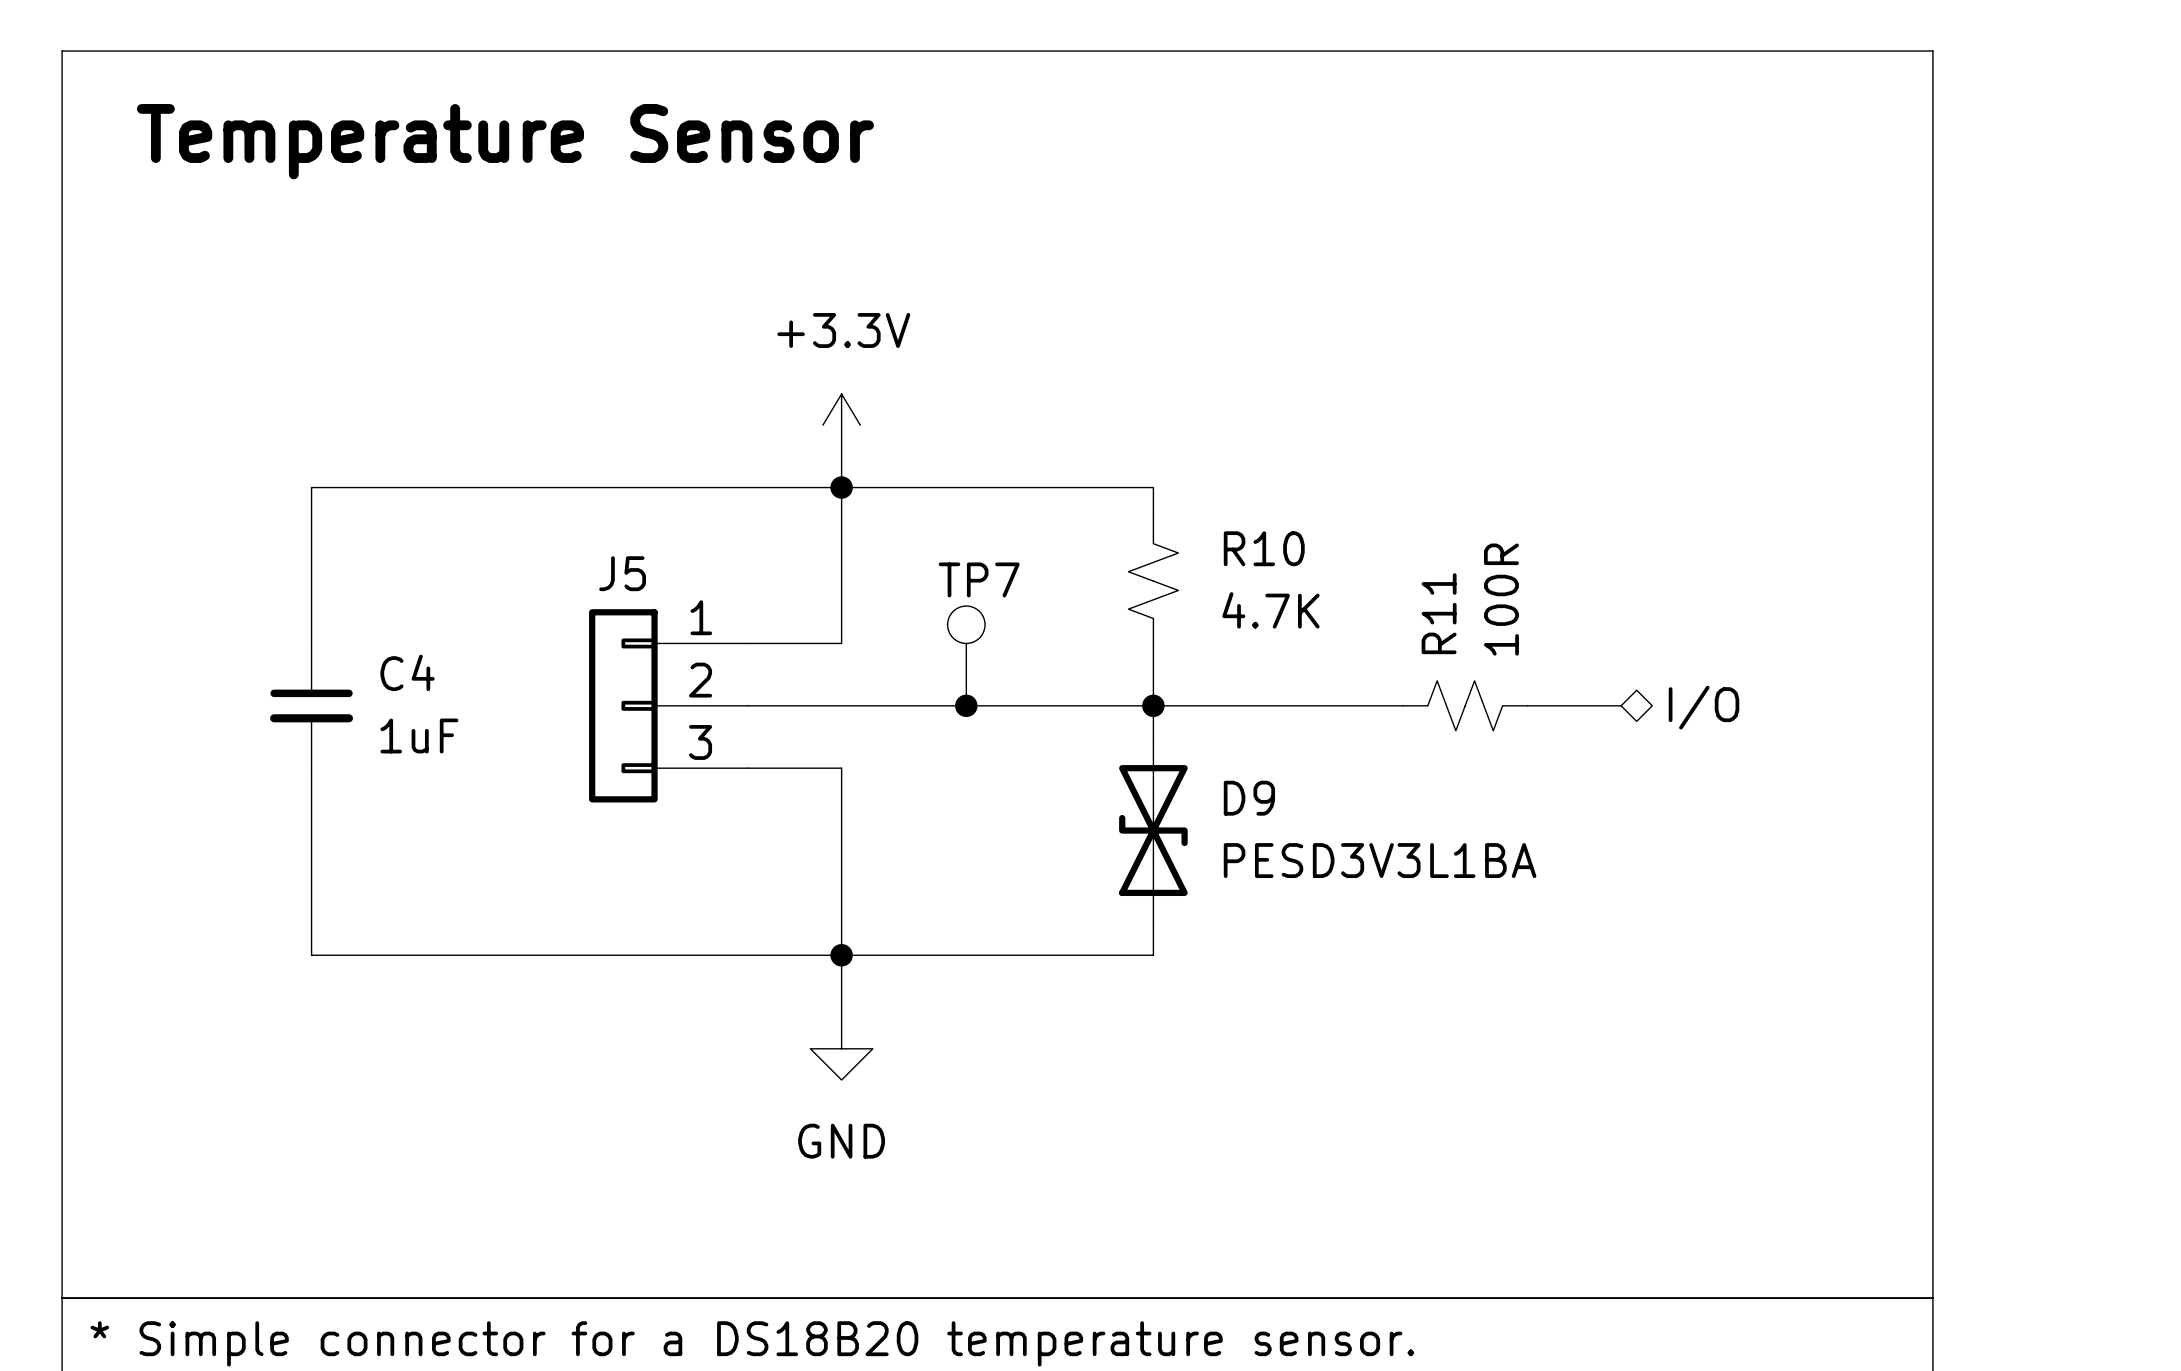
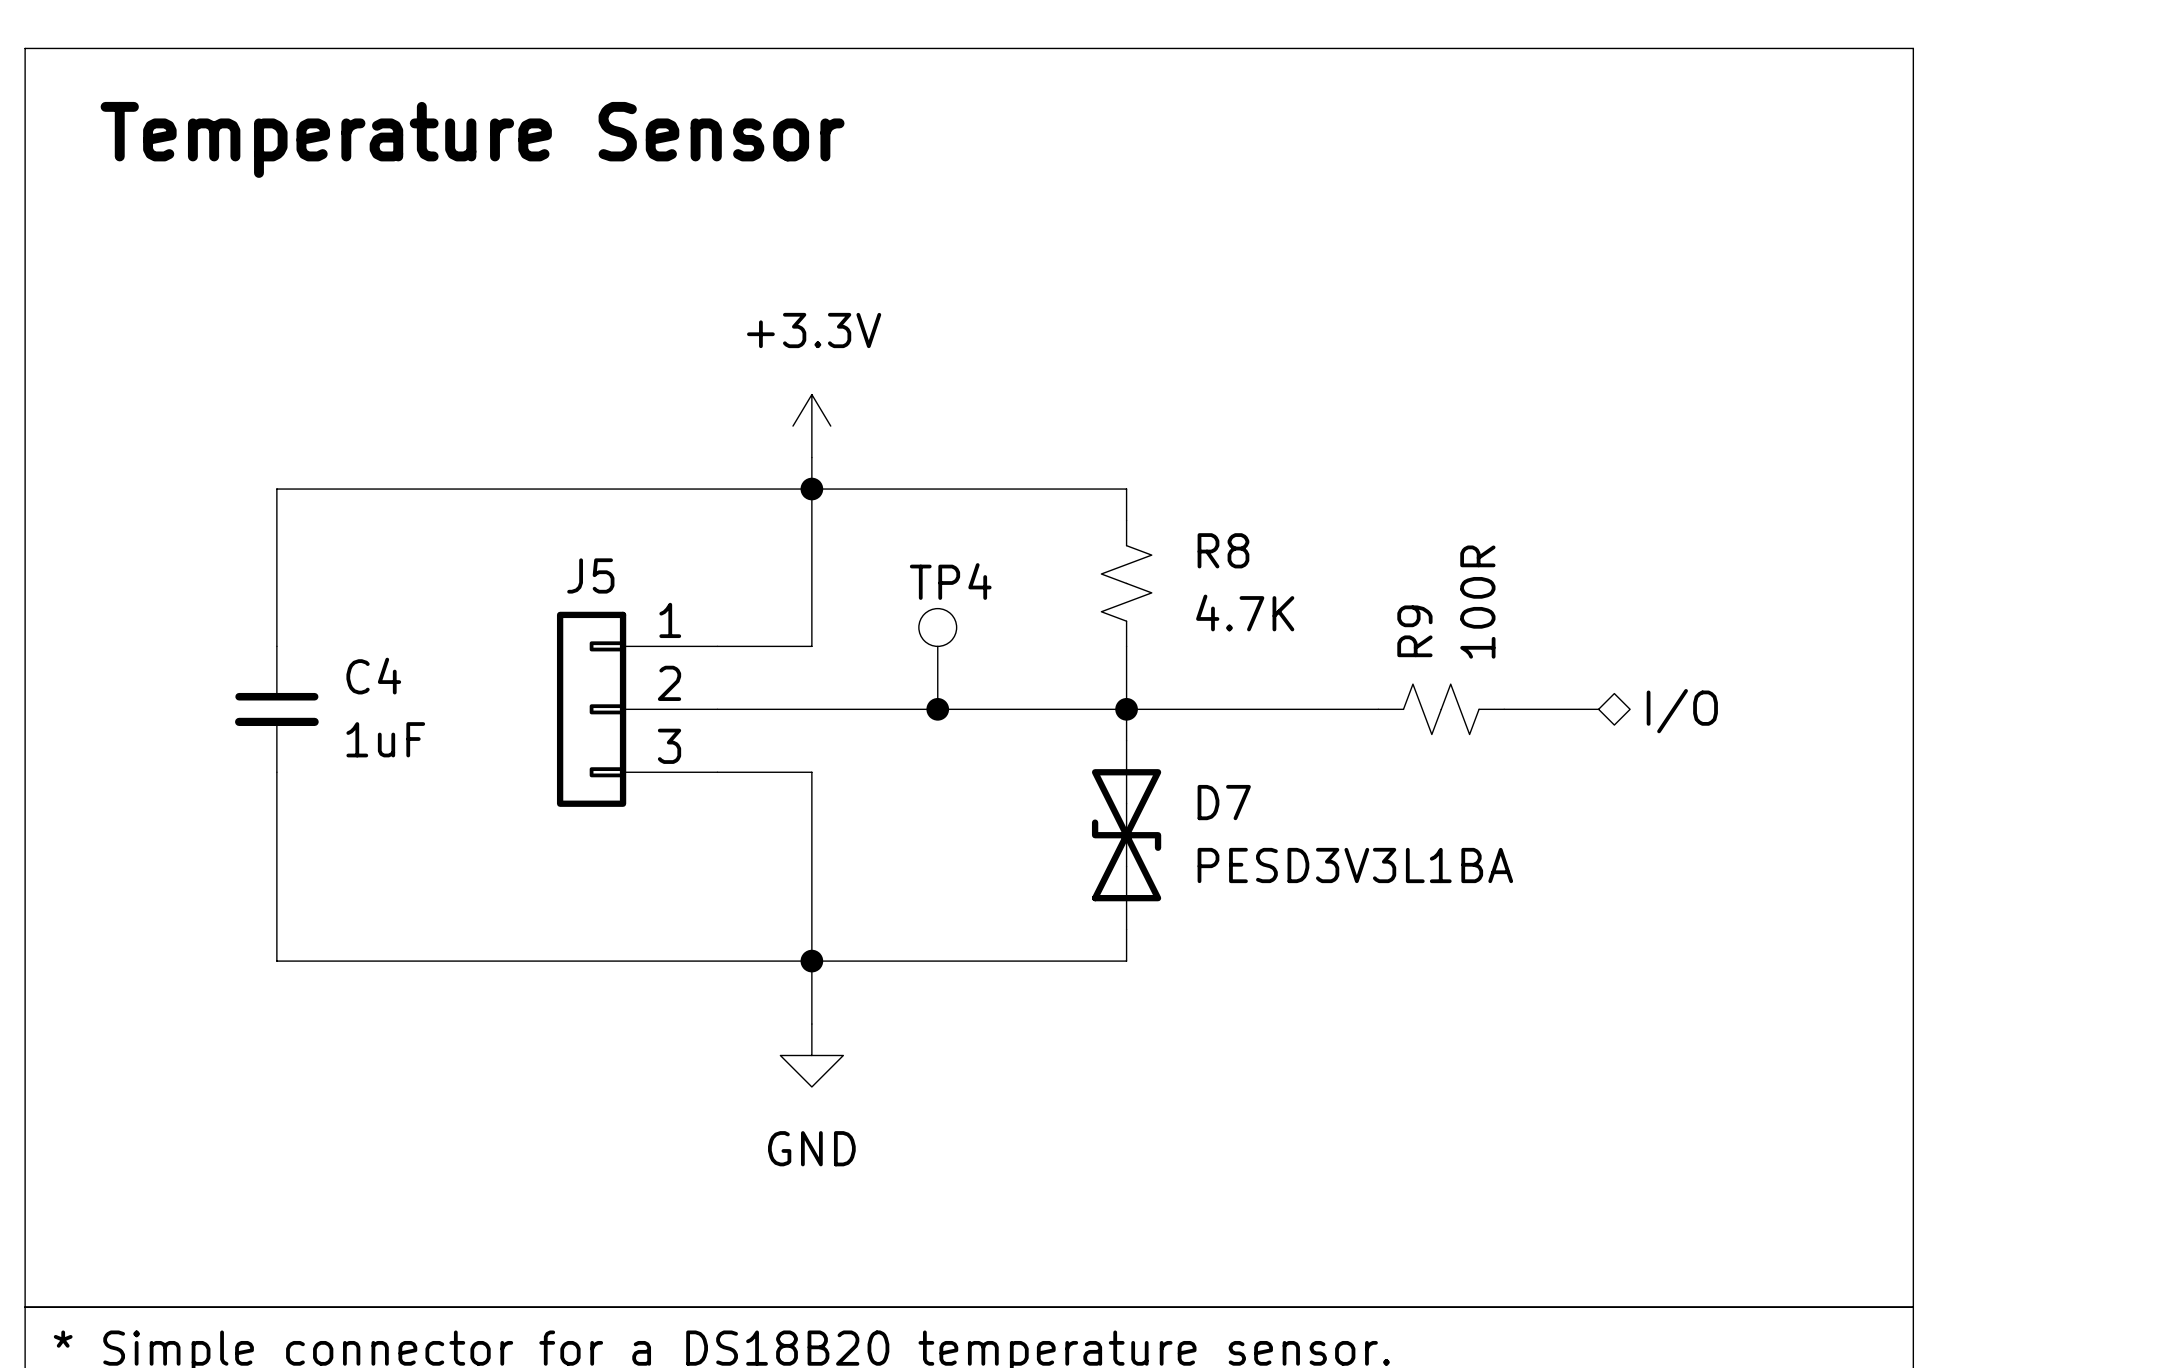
R10 name: R10 (1264, 548) -> R8 (1223, 550)
TP7 name: TP7 (979, 579) -> TP4 (950, 581)
R11 name: R11 (1439, 613) -> R9 (1414, 631)
D9 name: D9 (1249, 798) -> D7 (1224, 802)

